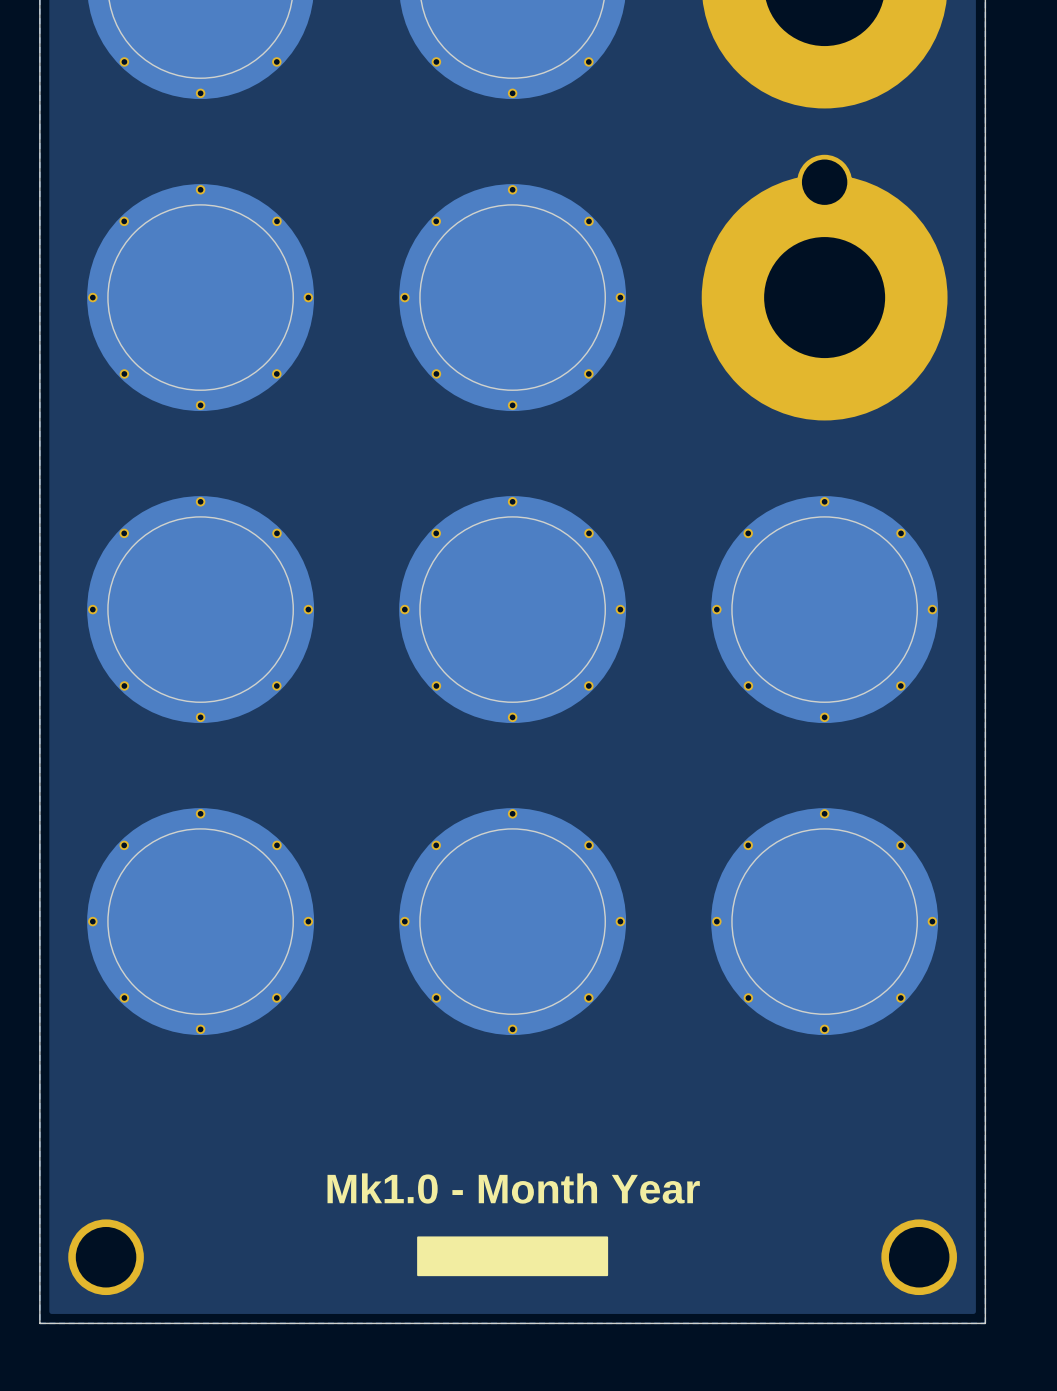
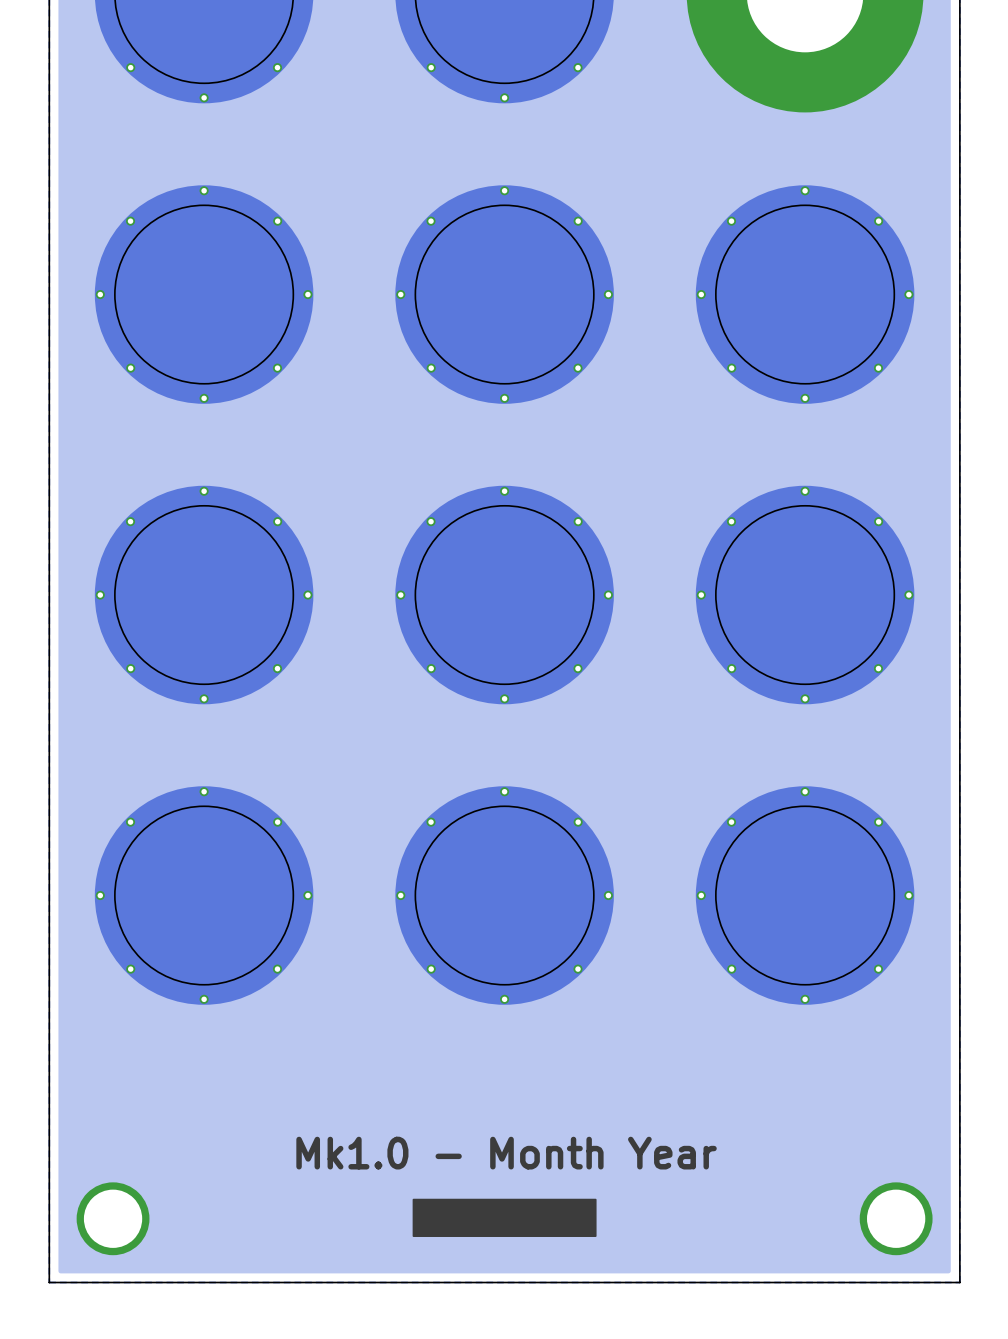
part footprint: [701, 154, 948, 421] -> [695, 185, 915, 404]

